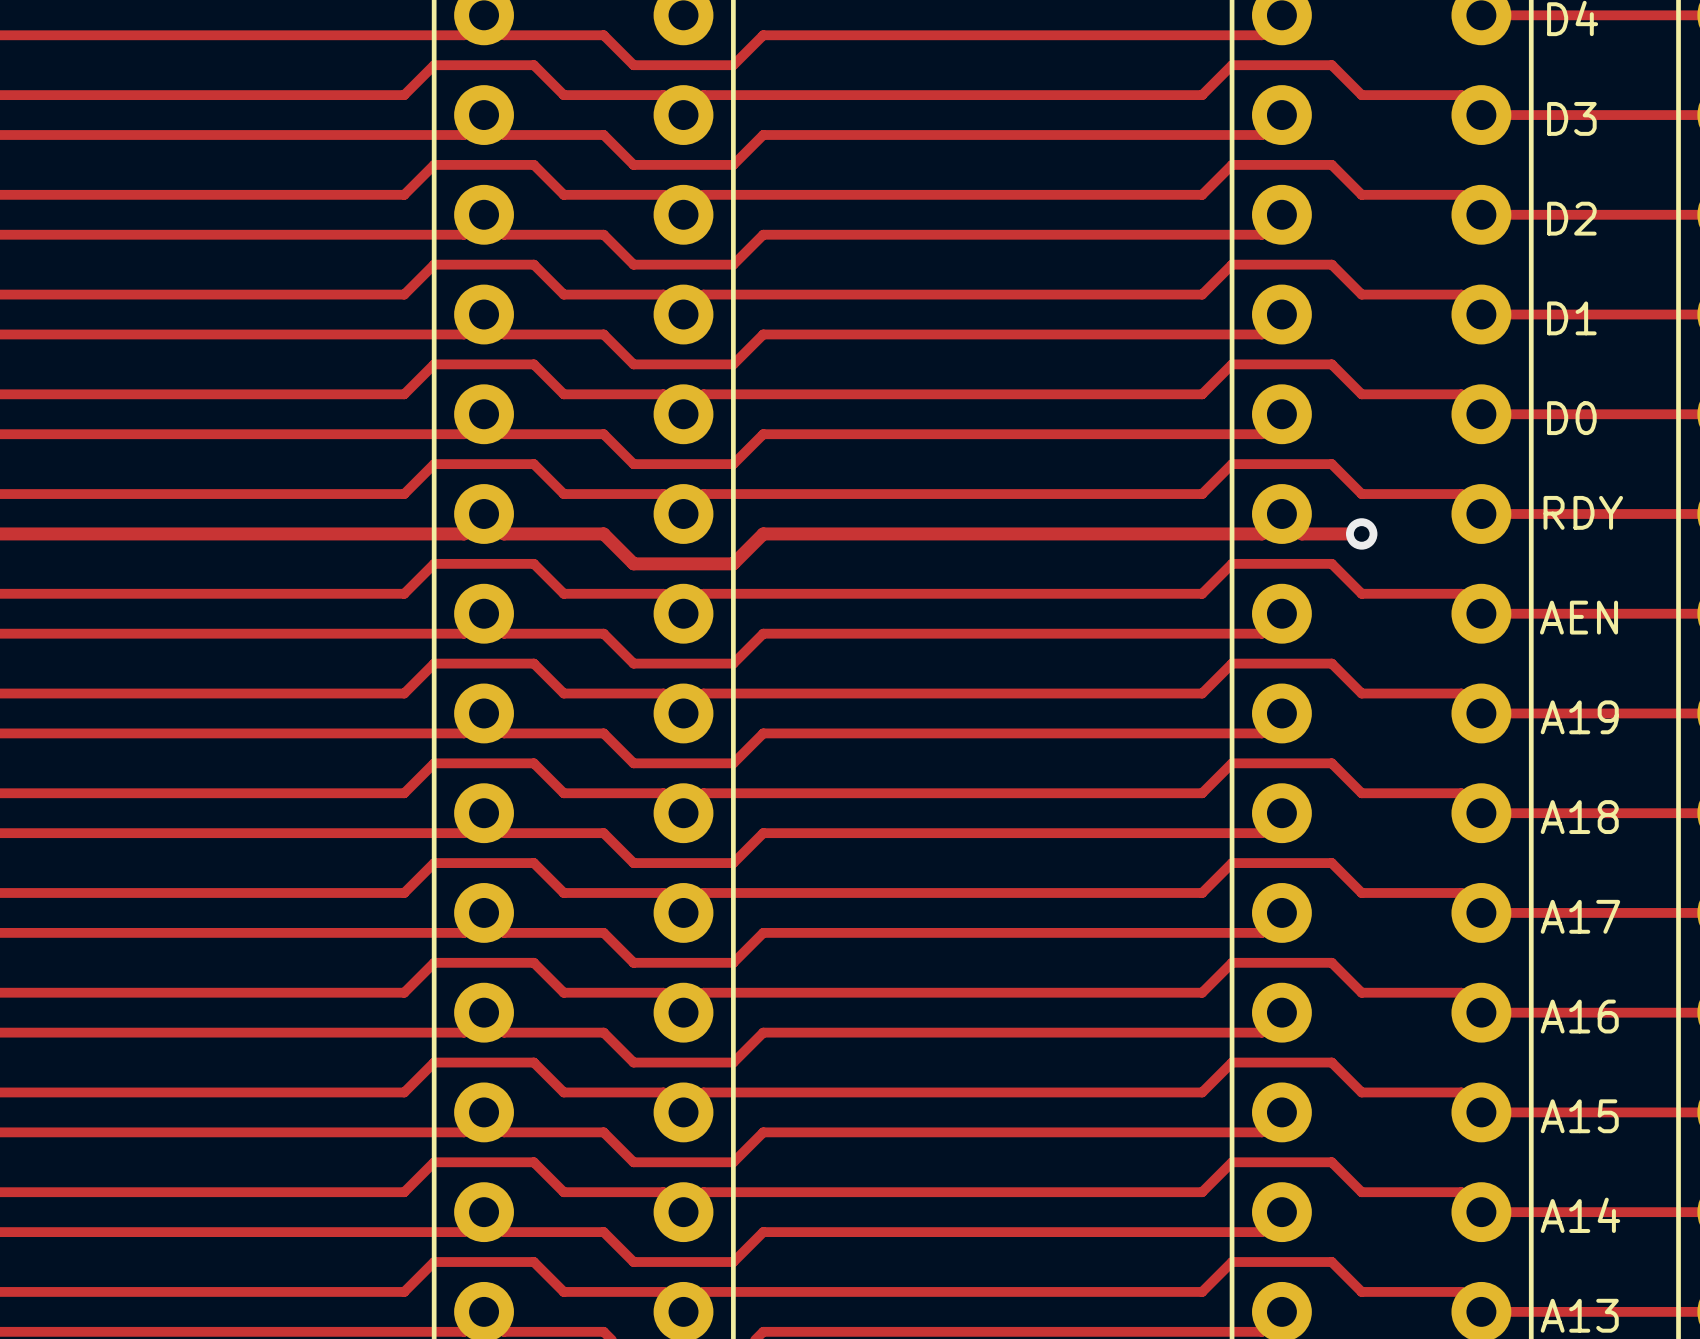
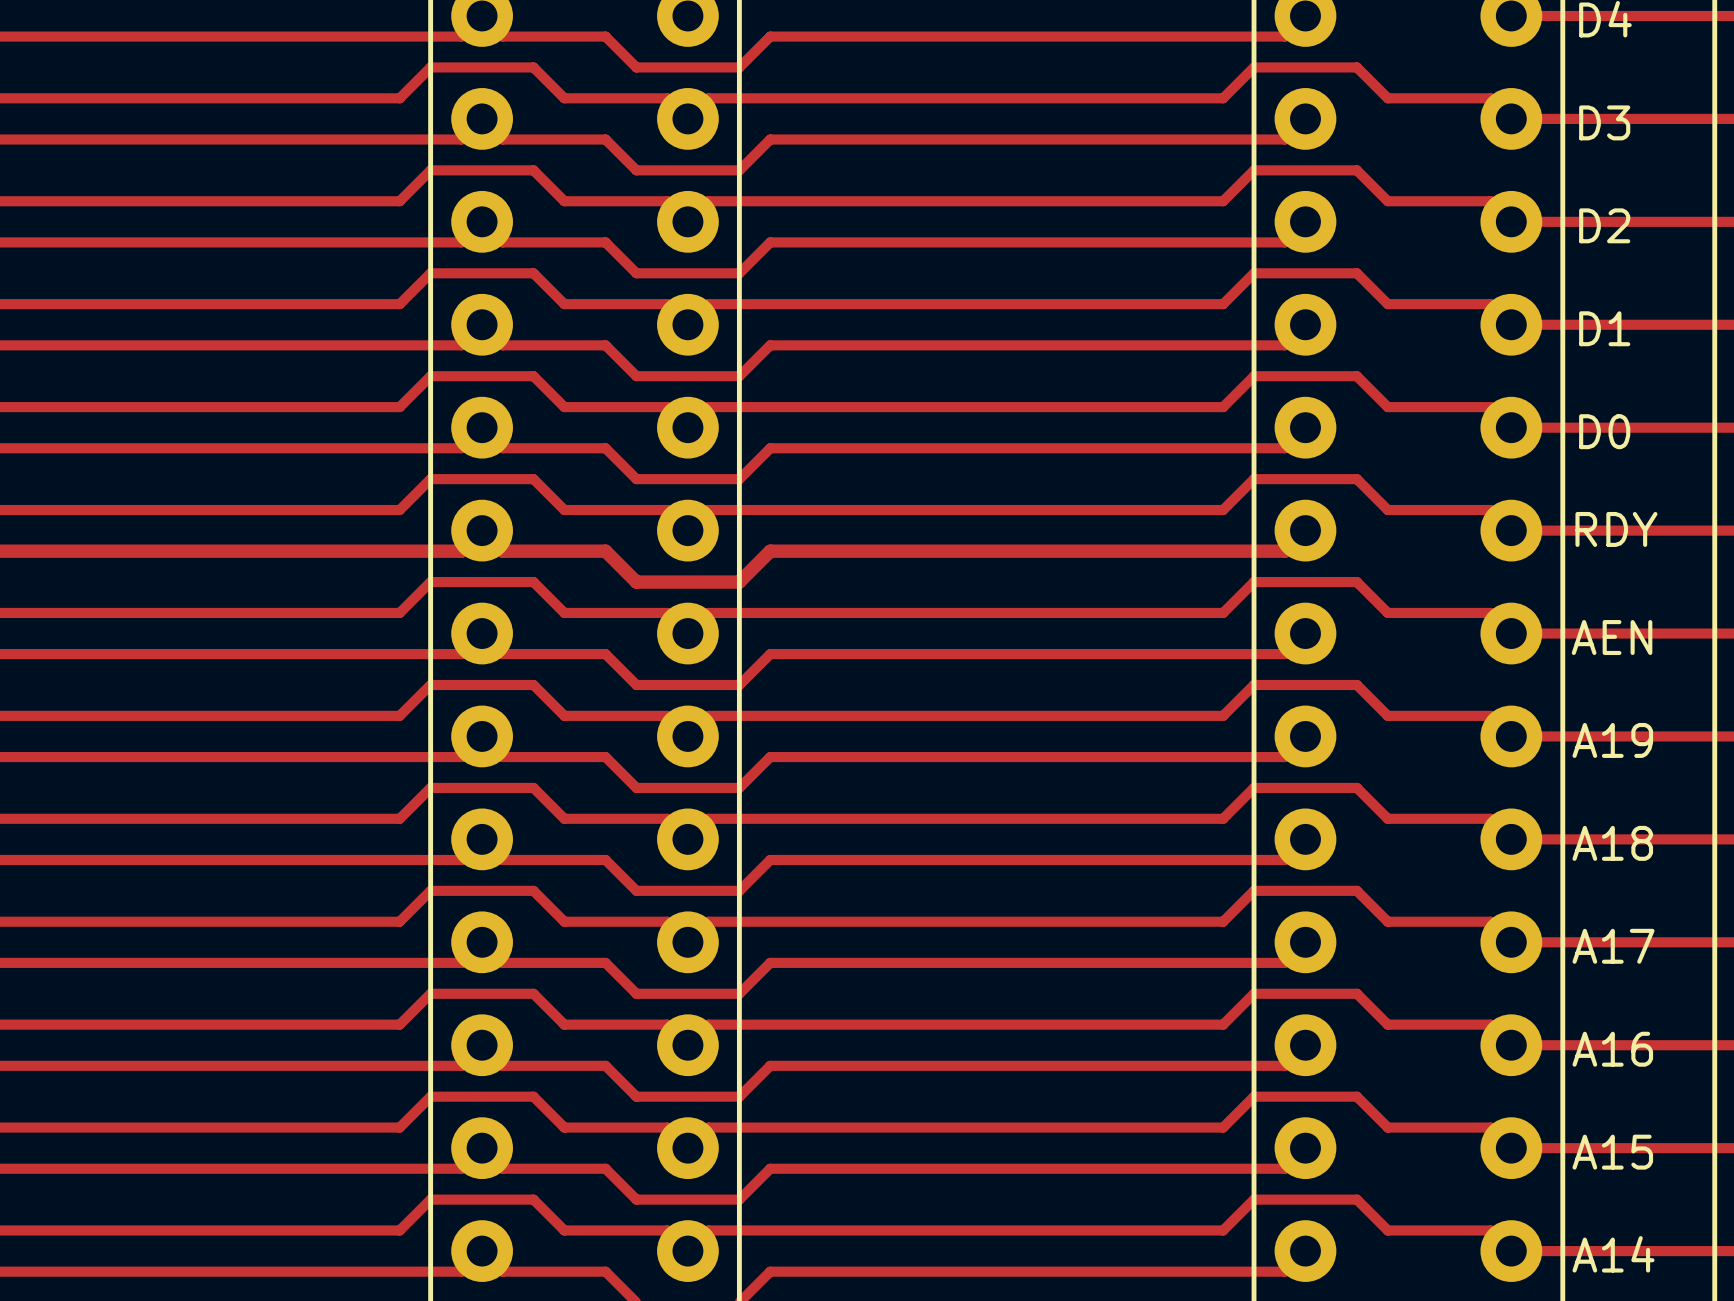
track: (1281, 513) (1301, 533) (1361, 533) -> none
via: (1361, 533) -> none

